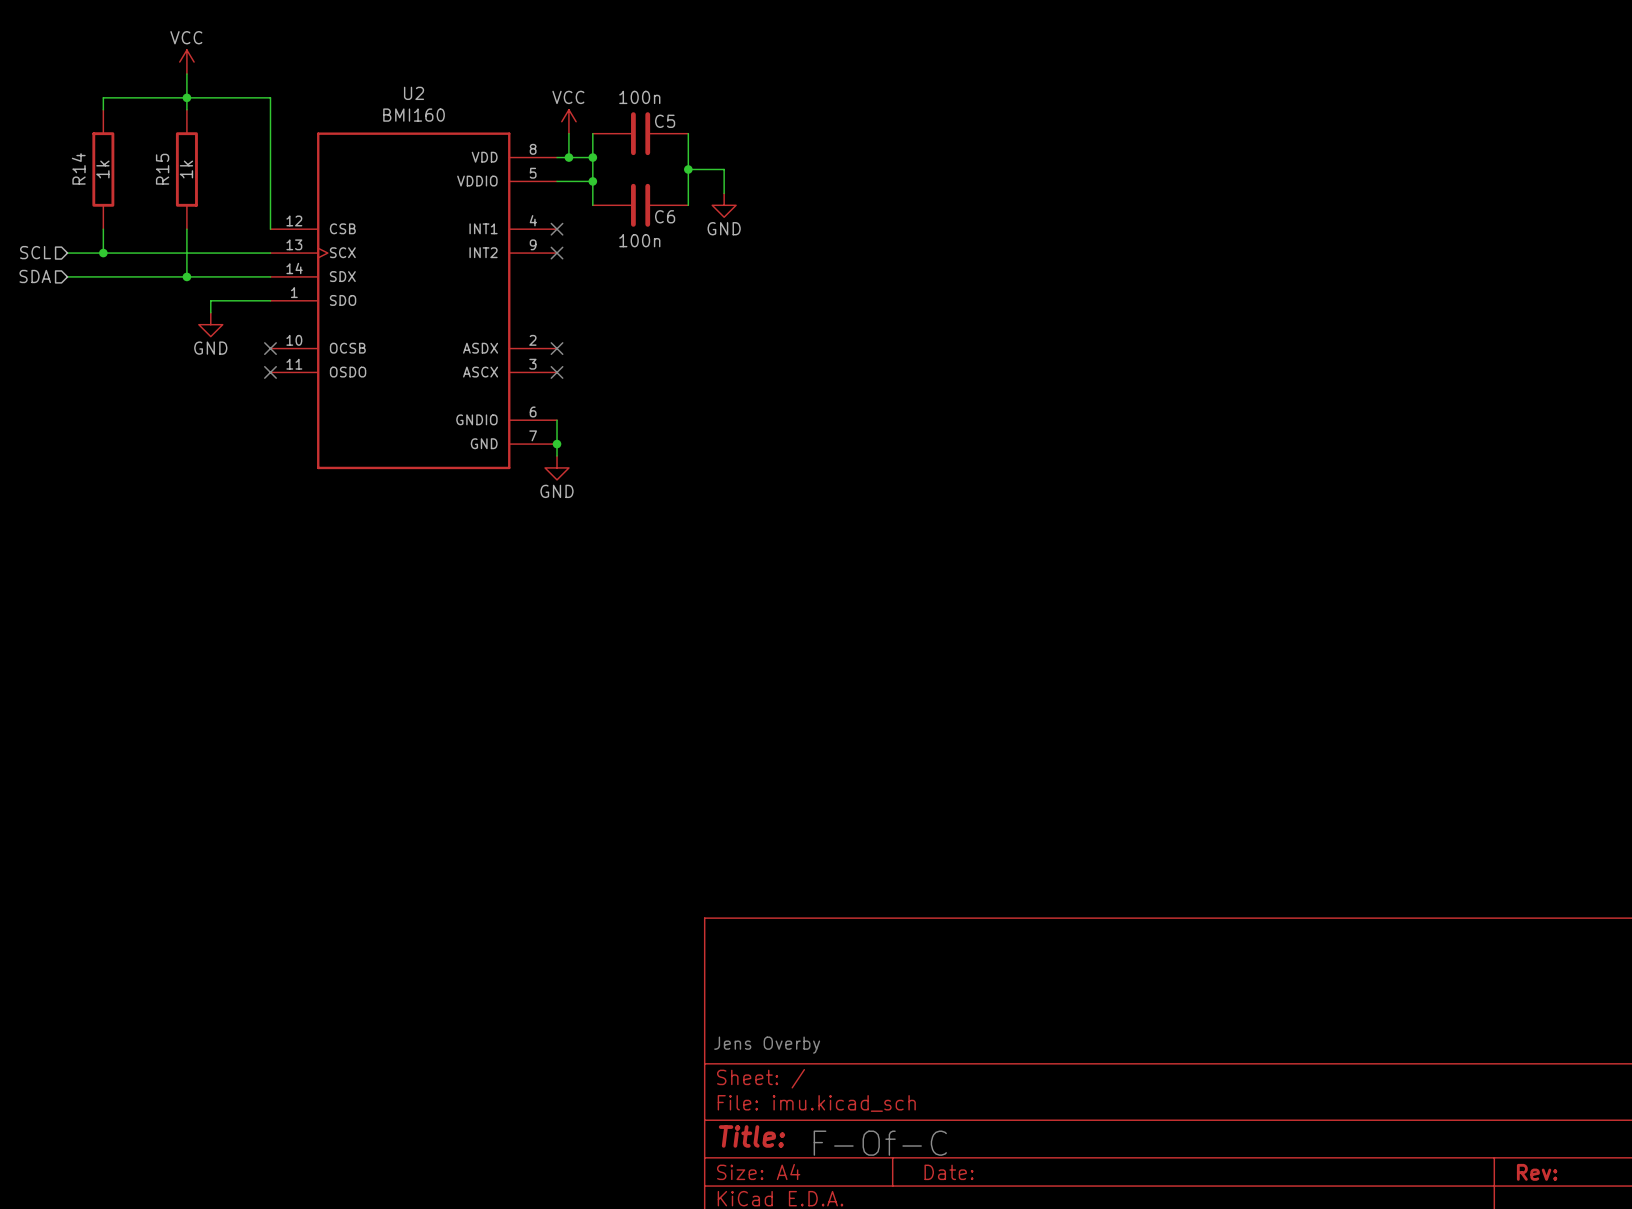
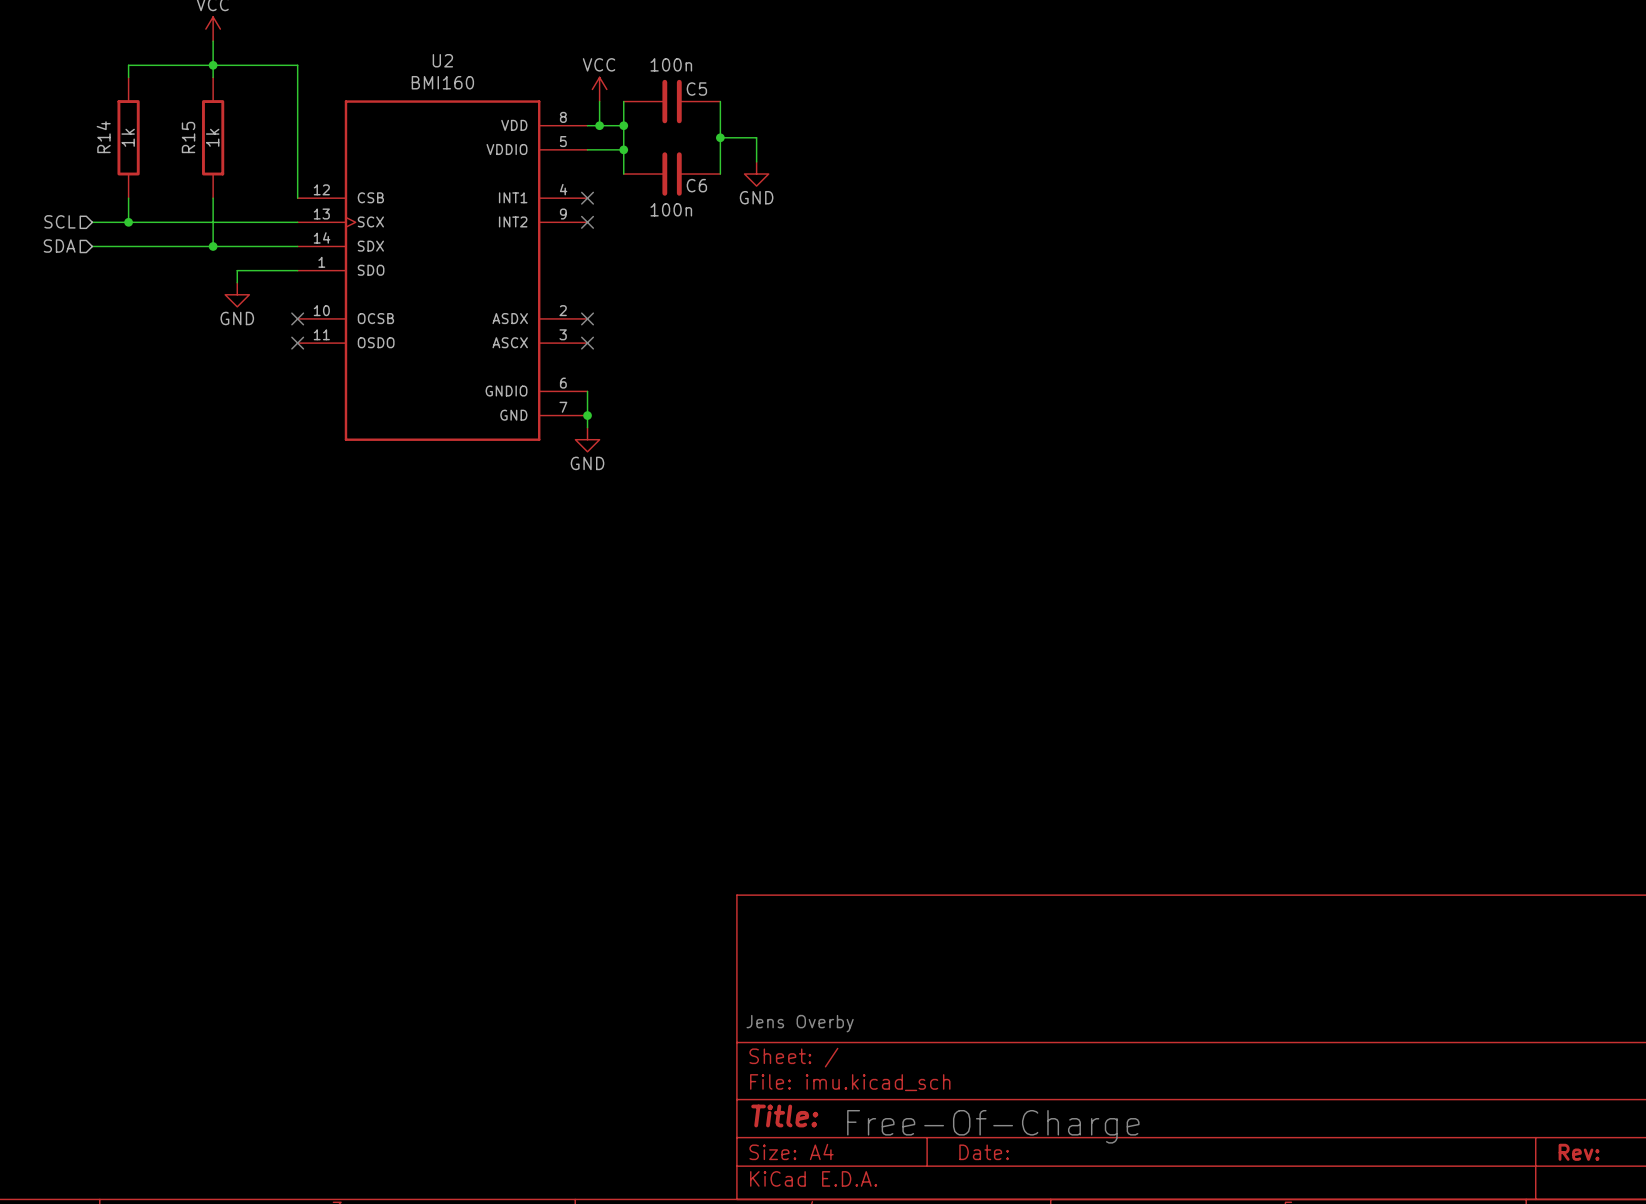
text: F-Of-C (880, 1143) -> Free-Of-Charge (993, 1126)

